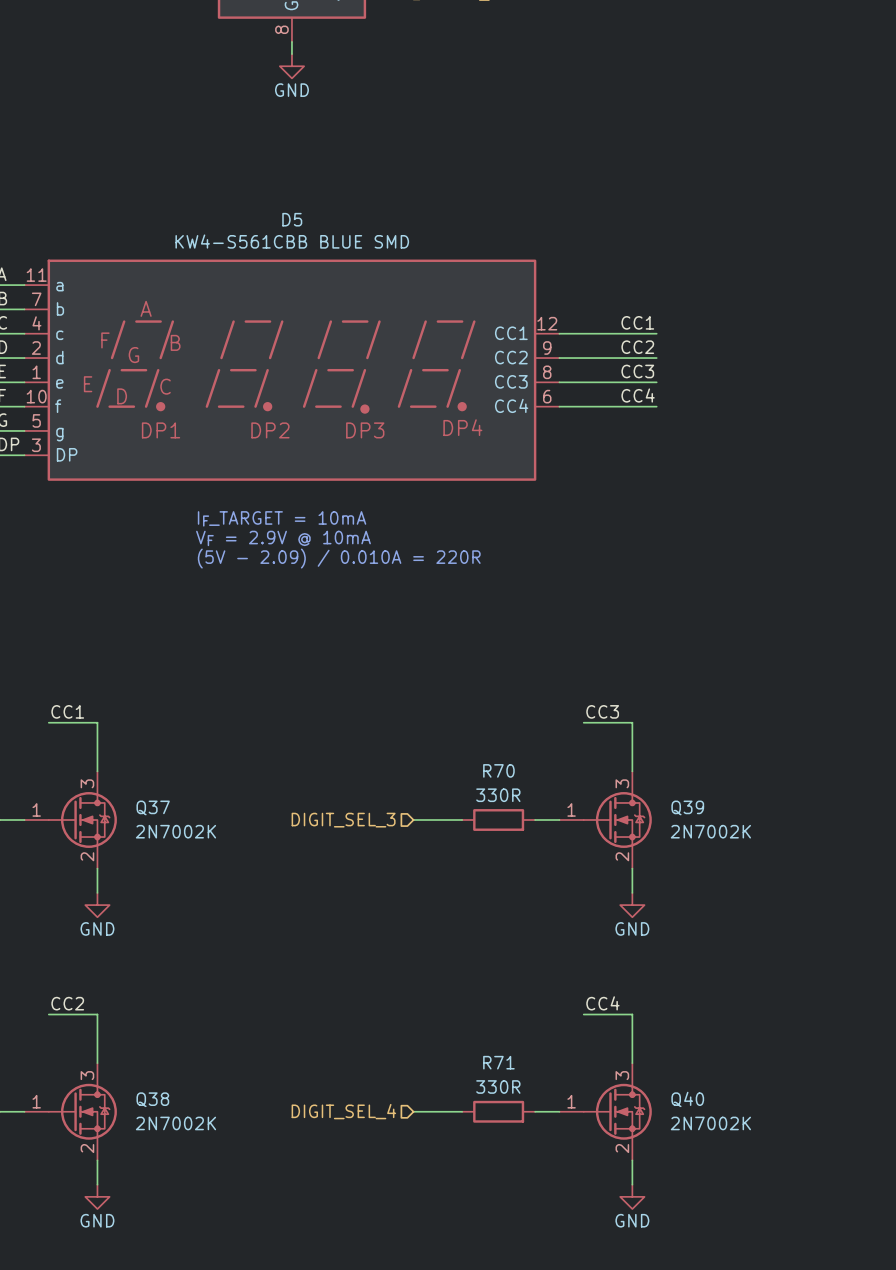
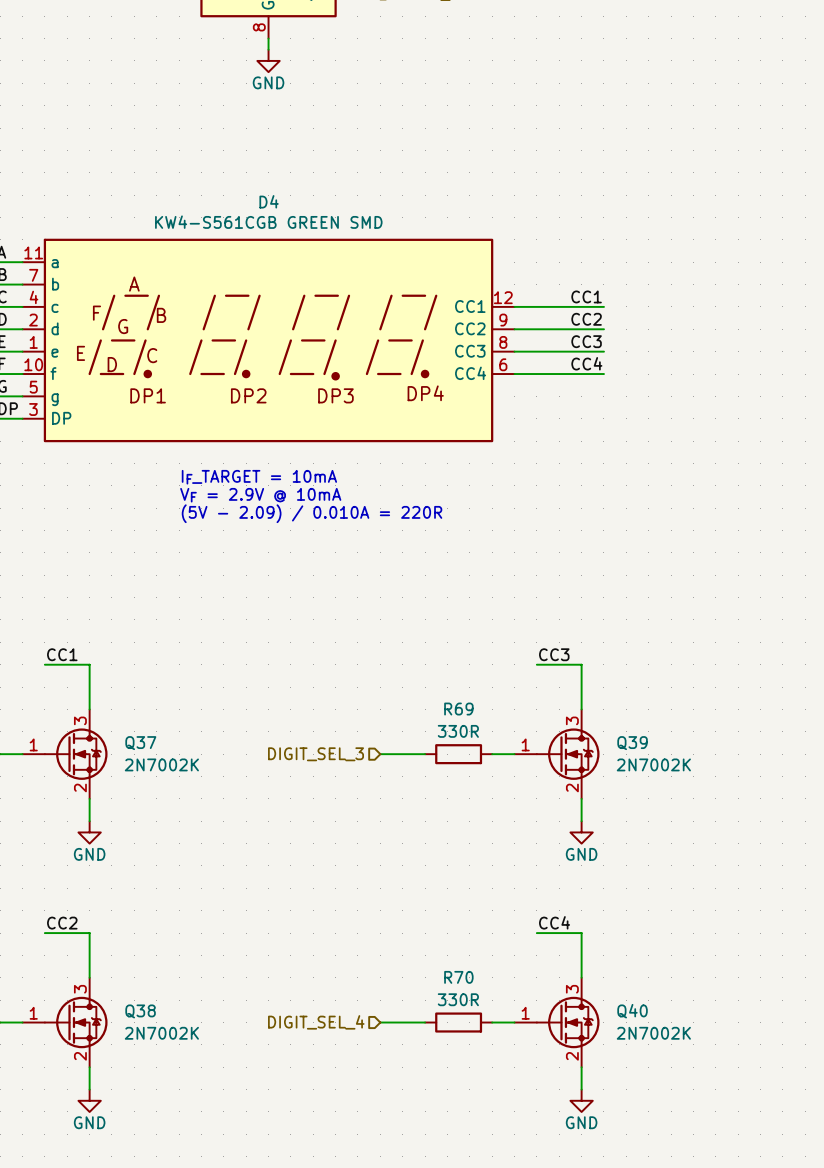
D5 name: D5 (292, 219) -> D4 (269, 201)
D5 value: KW4-S561CBB BLUE SMD (292, 241) -> KW4-S561CGB GREEN SMD (268, 222)
R70 name: R70 (498, 770) -> R69 (458, 709)
R71 name: R71 (498, 1062) -> R70 (458, 977)

